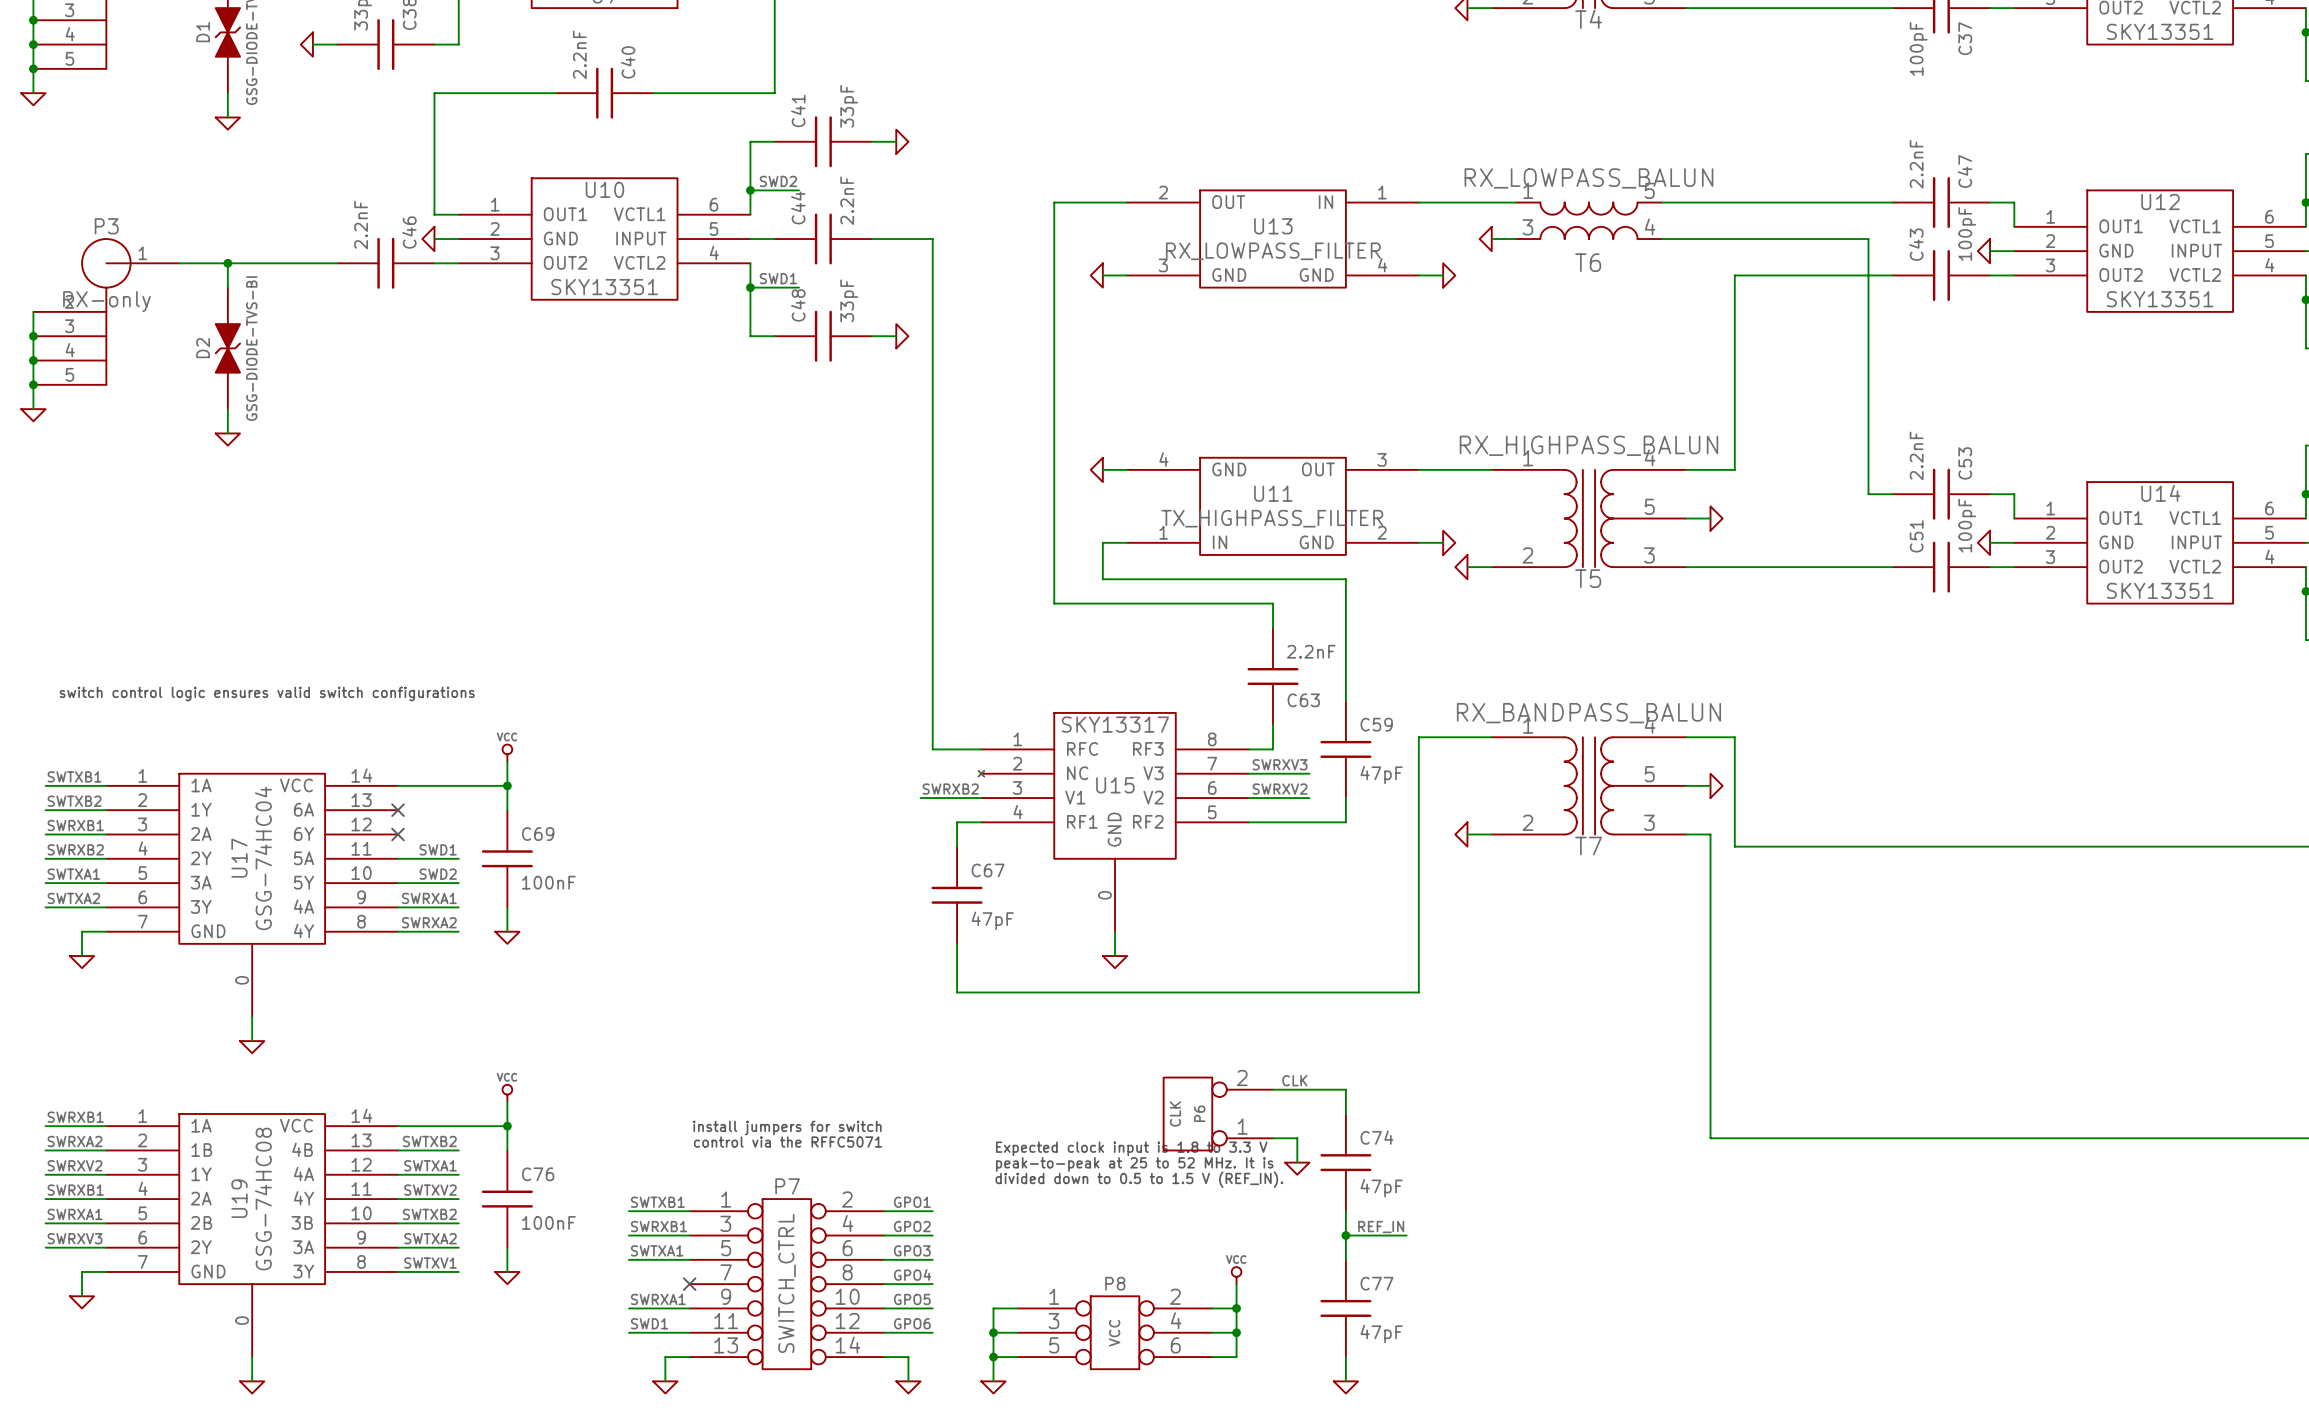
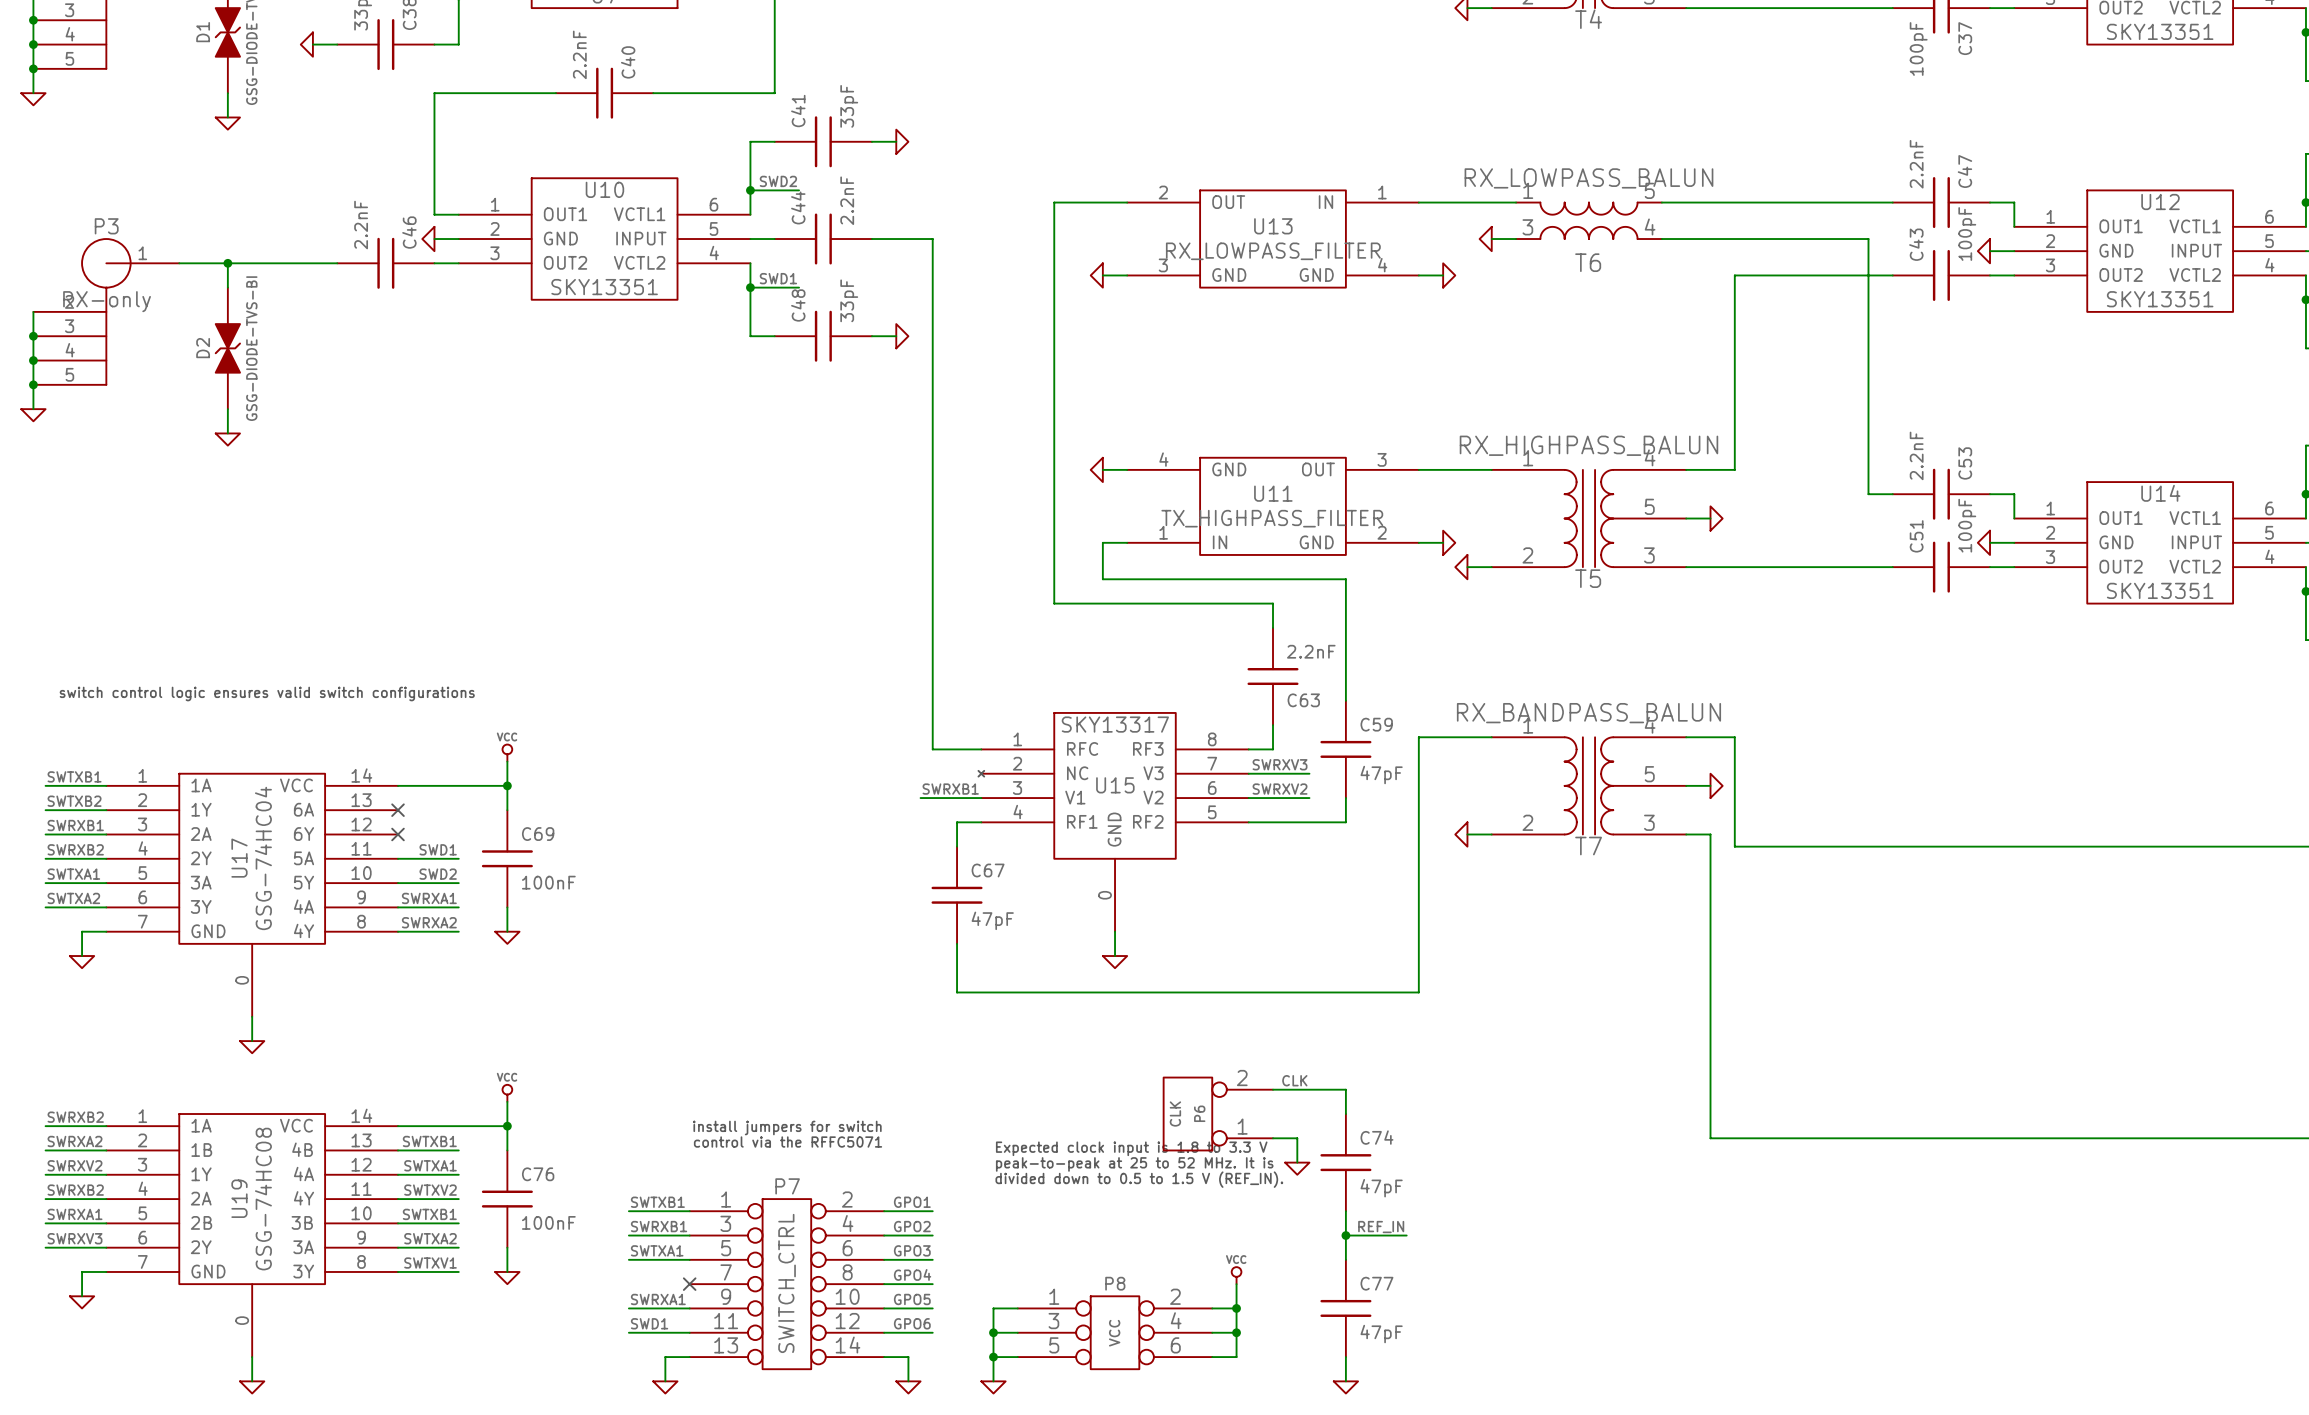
label: SWRXB2 (950, 789) -> SWRXB1 (950, 789)
label: SWRXB1 (75, 1117) -> SWRXB2 (75, 1117)
label: SWTXB2 (429, 1141) -> SWTXB1 (429, 1141)
label: SWRXB1 (75, 1190) -> SWRXB2 (75, 1190)
label: SWTXB2 (429, 1214) -> SWTXB1 (429, 1214)

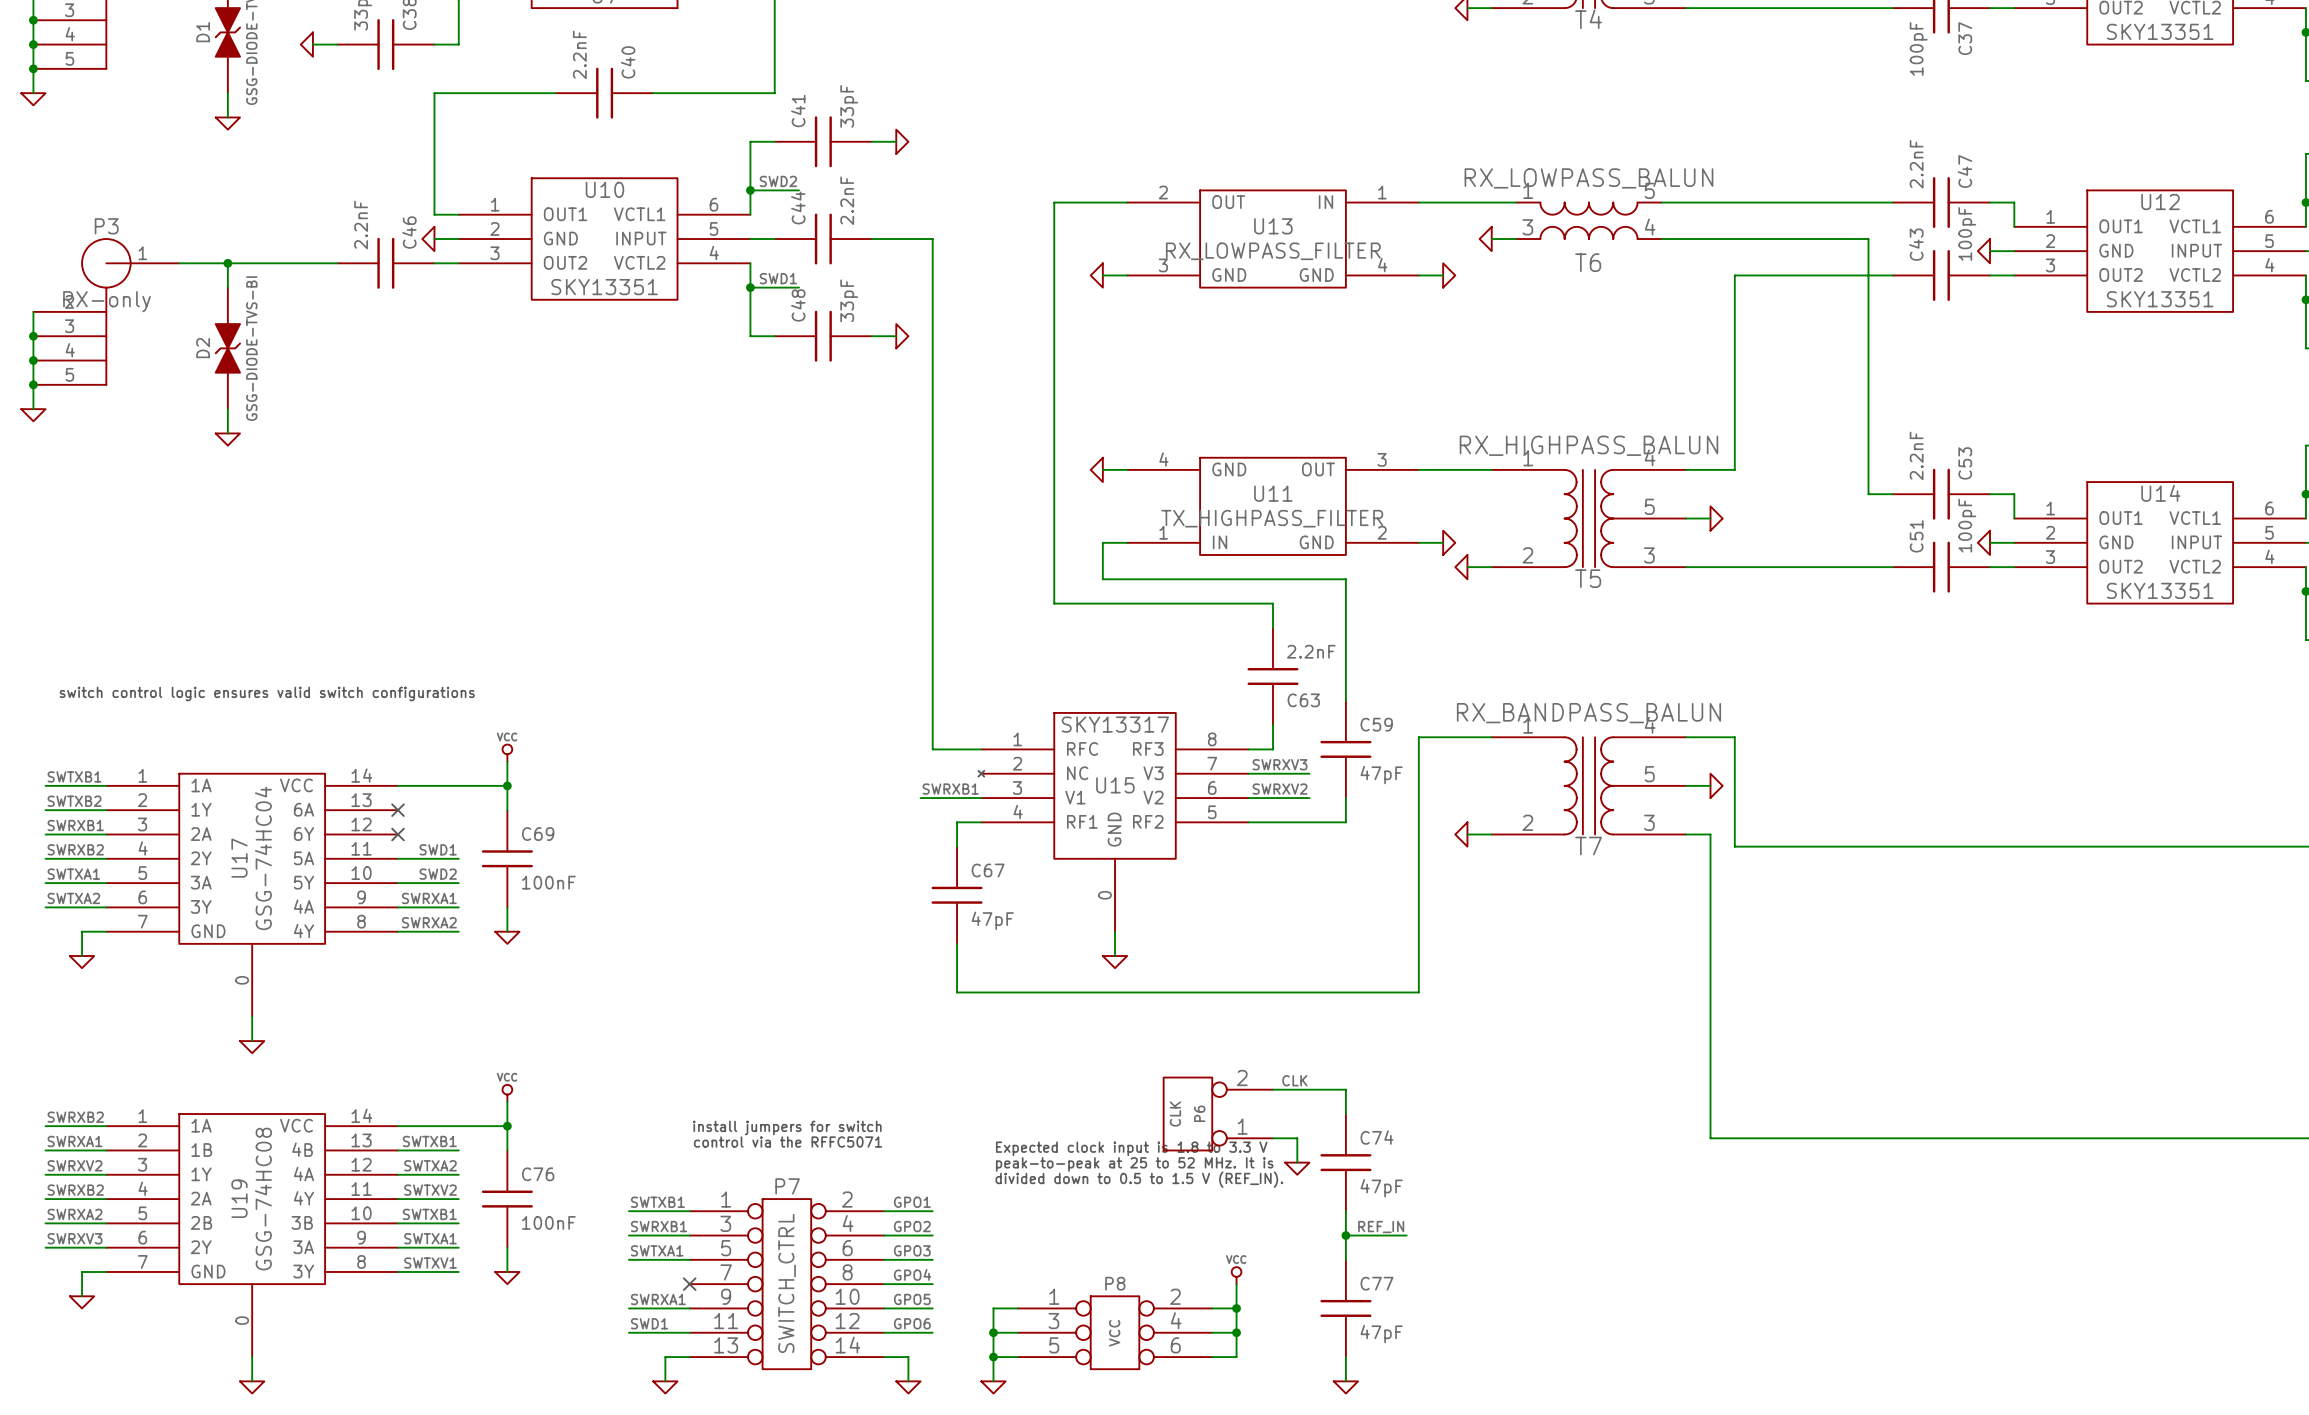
label: SWRXA2 (75, 1141) -> SWRXA1 (75, 1141)
label: SWTXA1 (430, 1165) -> SWTXA2 (430, 1165)
label: SWRXA1 (75, 1214) -> SWRXA2 (75, 1214)
label: SWTXA2 (430, 1238) -> SWTXA1 (430, 1238)

